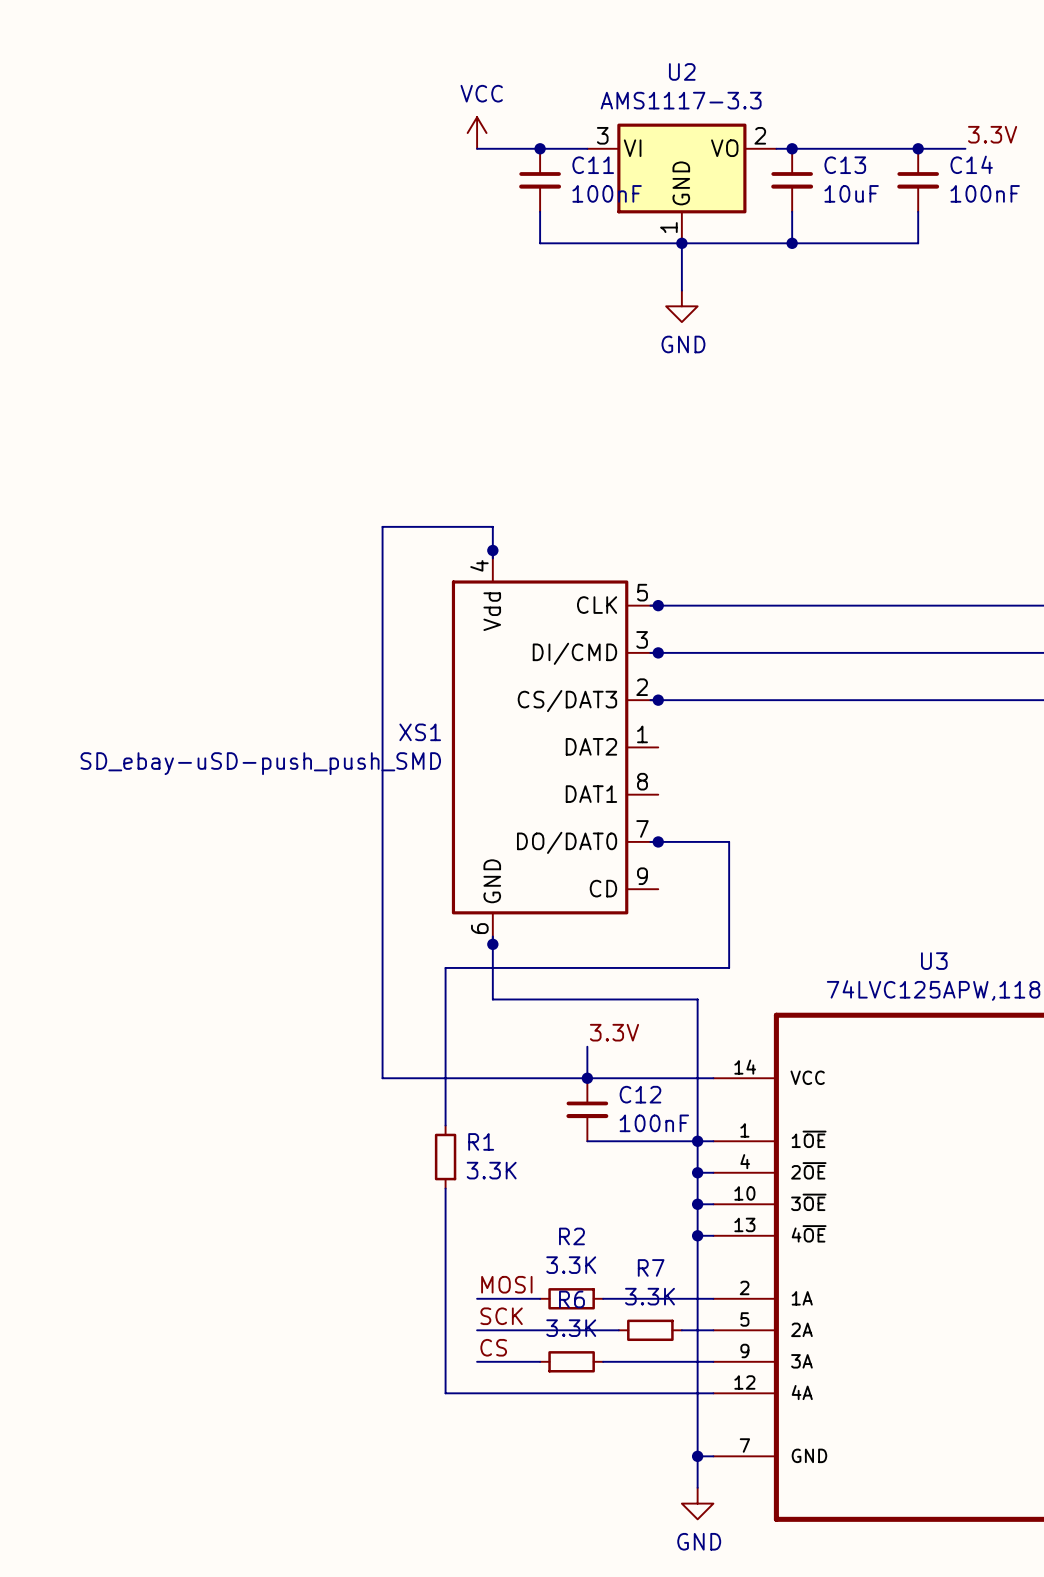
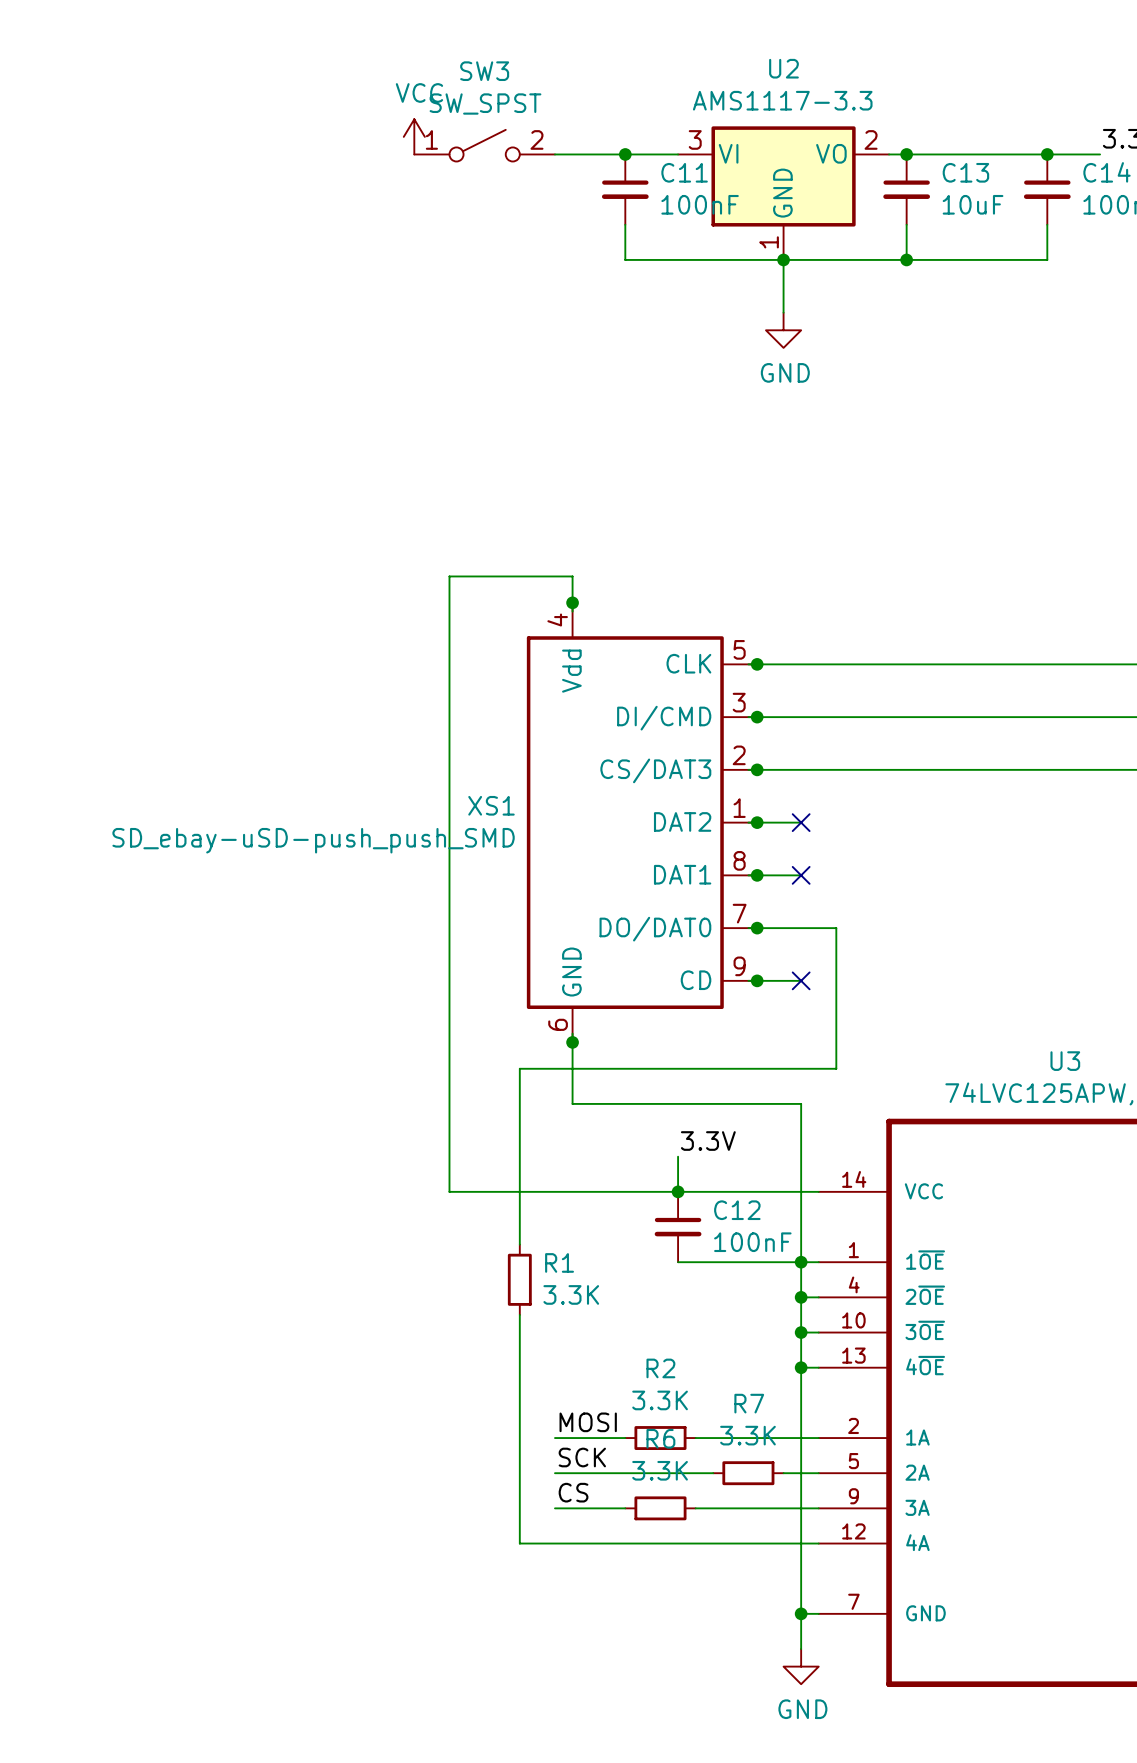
power symbol position: VCC (477, 133) -> VCC (414, 136)
SW3: none -> SW_SPST (484, 145)
wire: none -> (748, 822) (801, 822)
junction: none -> (757, 822)
no-connect mark: none -> (801, 822)
wire: none -> (748, 875) (801, 875)
junction: none -> (757, 875)
no-connect mark: none -> (801, 875)
wire: none -> (748, 980) (801, 980)
junction: none -> (757, 980)
no-connect mark: none -> (801, 980)

